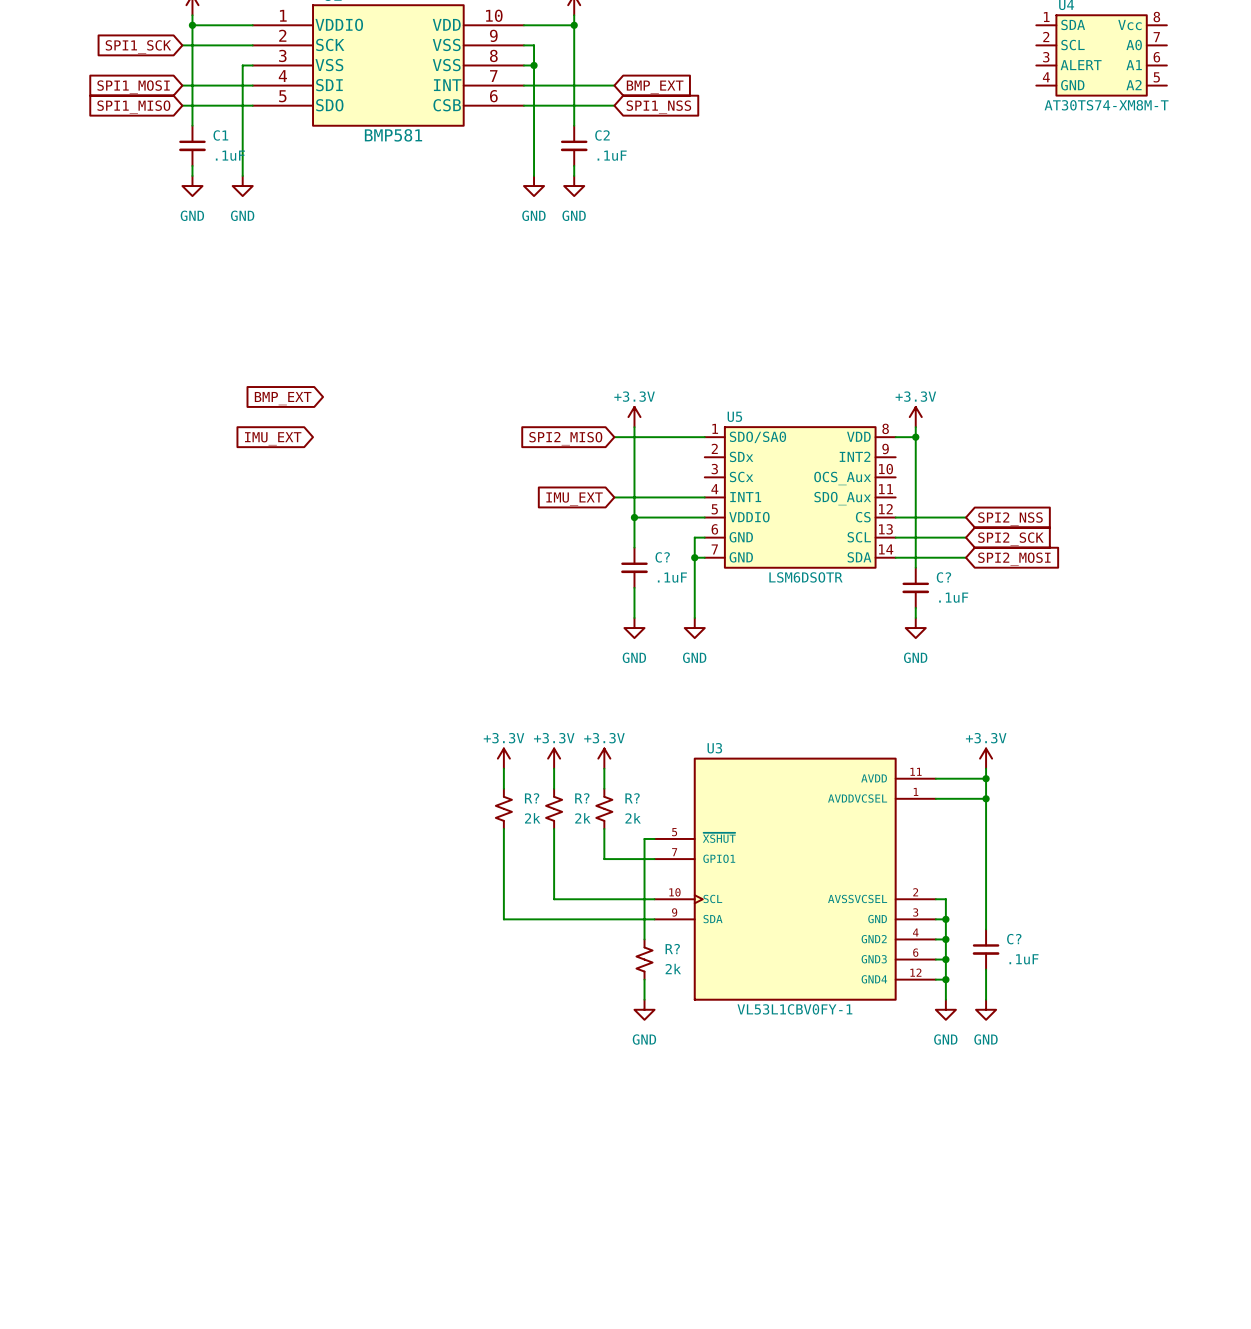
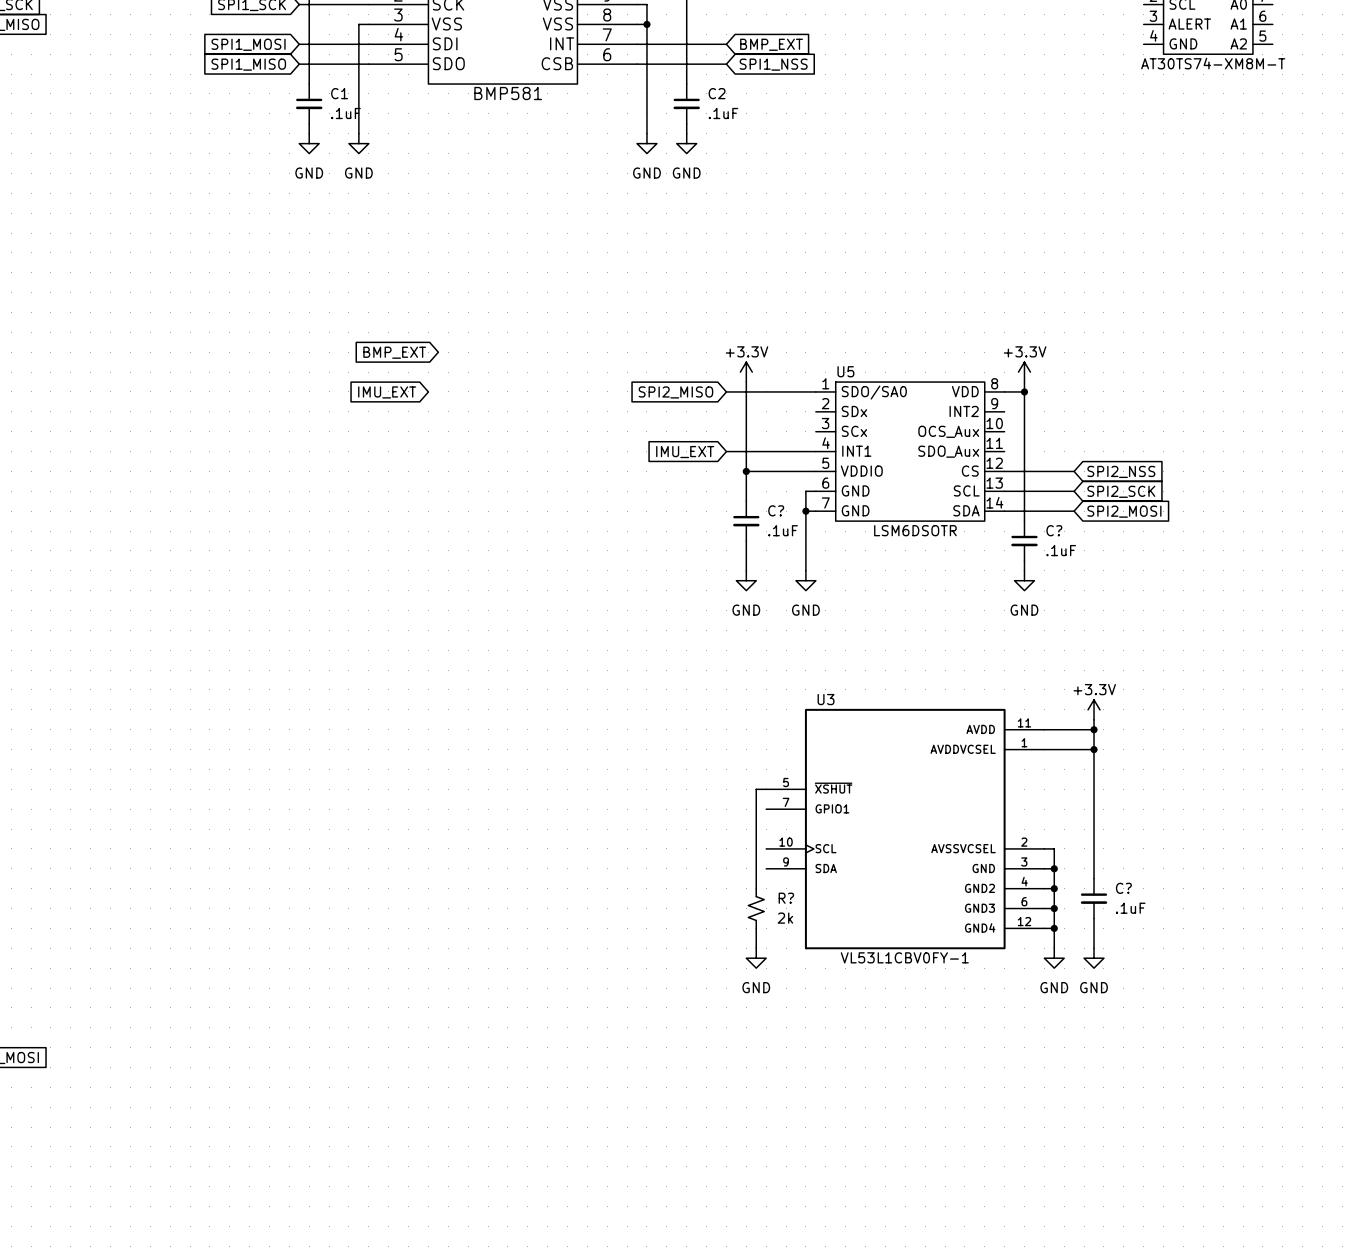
power symbol: +3.3V (503, 758) -> none
power symbol: +3.3V (554, 758) -> none
power symbol: +3.3V (604, 758) -> none
wire: (503, 768) (503, 788) -> none
wire: (554, 768) (554, 788) -> none
wire: (604, 768) (604, 788) -> none
R?: 2k (503, 808) -> none
R?: 2k (554, 808) -> none
R?: 2k (604, 808) -> none
wire: (503, 828) (503, 919) (654, 919) -> none
wire: (554, 828) (554, 899) (654, 899) -> none
wire: (604, 828) (604, 859) (654, 859) -> none

